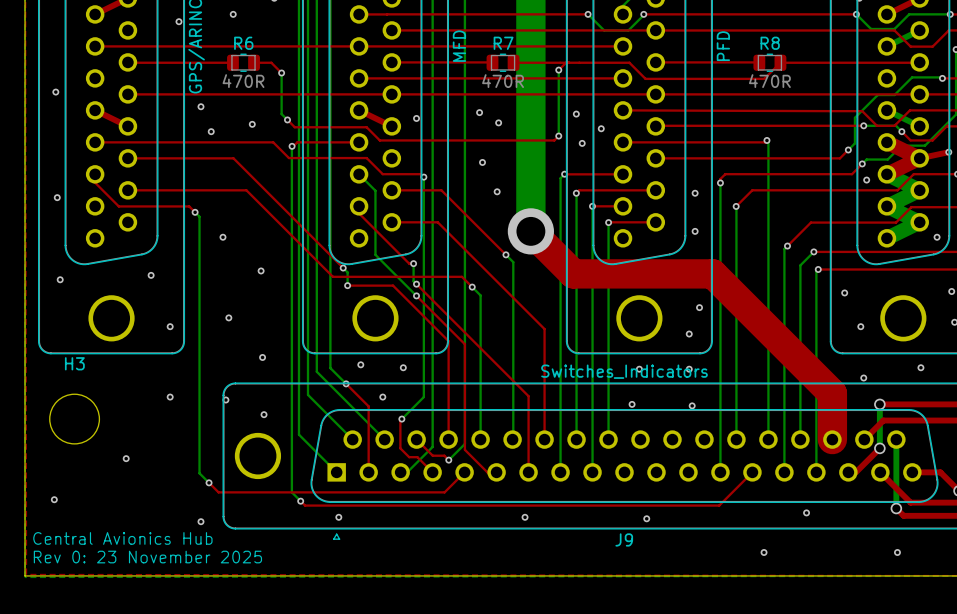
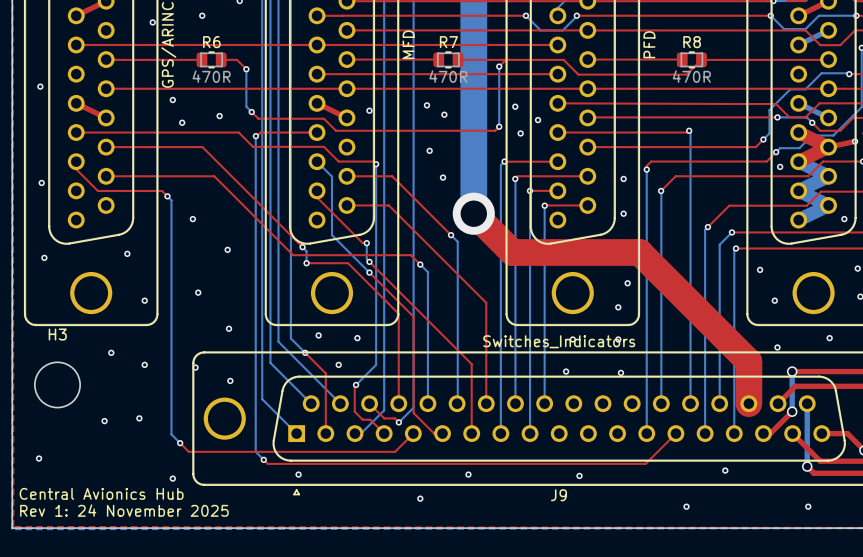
via: none -> (111, 352)
via: none -> (139, 418)
via: none -> (420, 498)
text: Rev 0: 23 November 2025 (147, 557) -> Rev 1: 24 November 2025 (124, 510)

